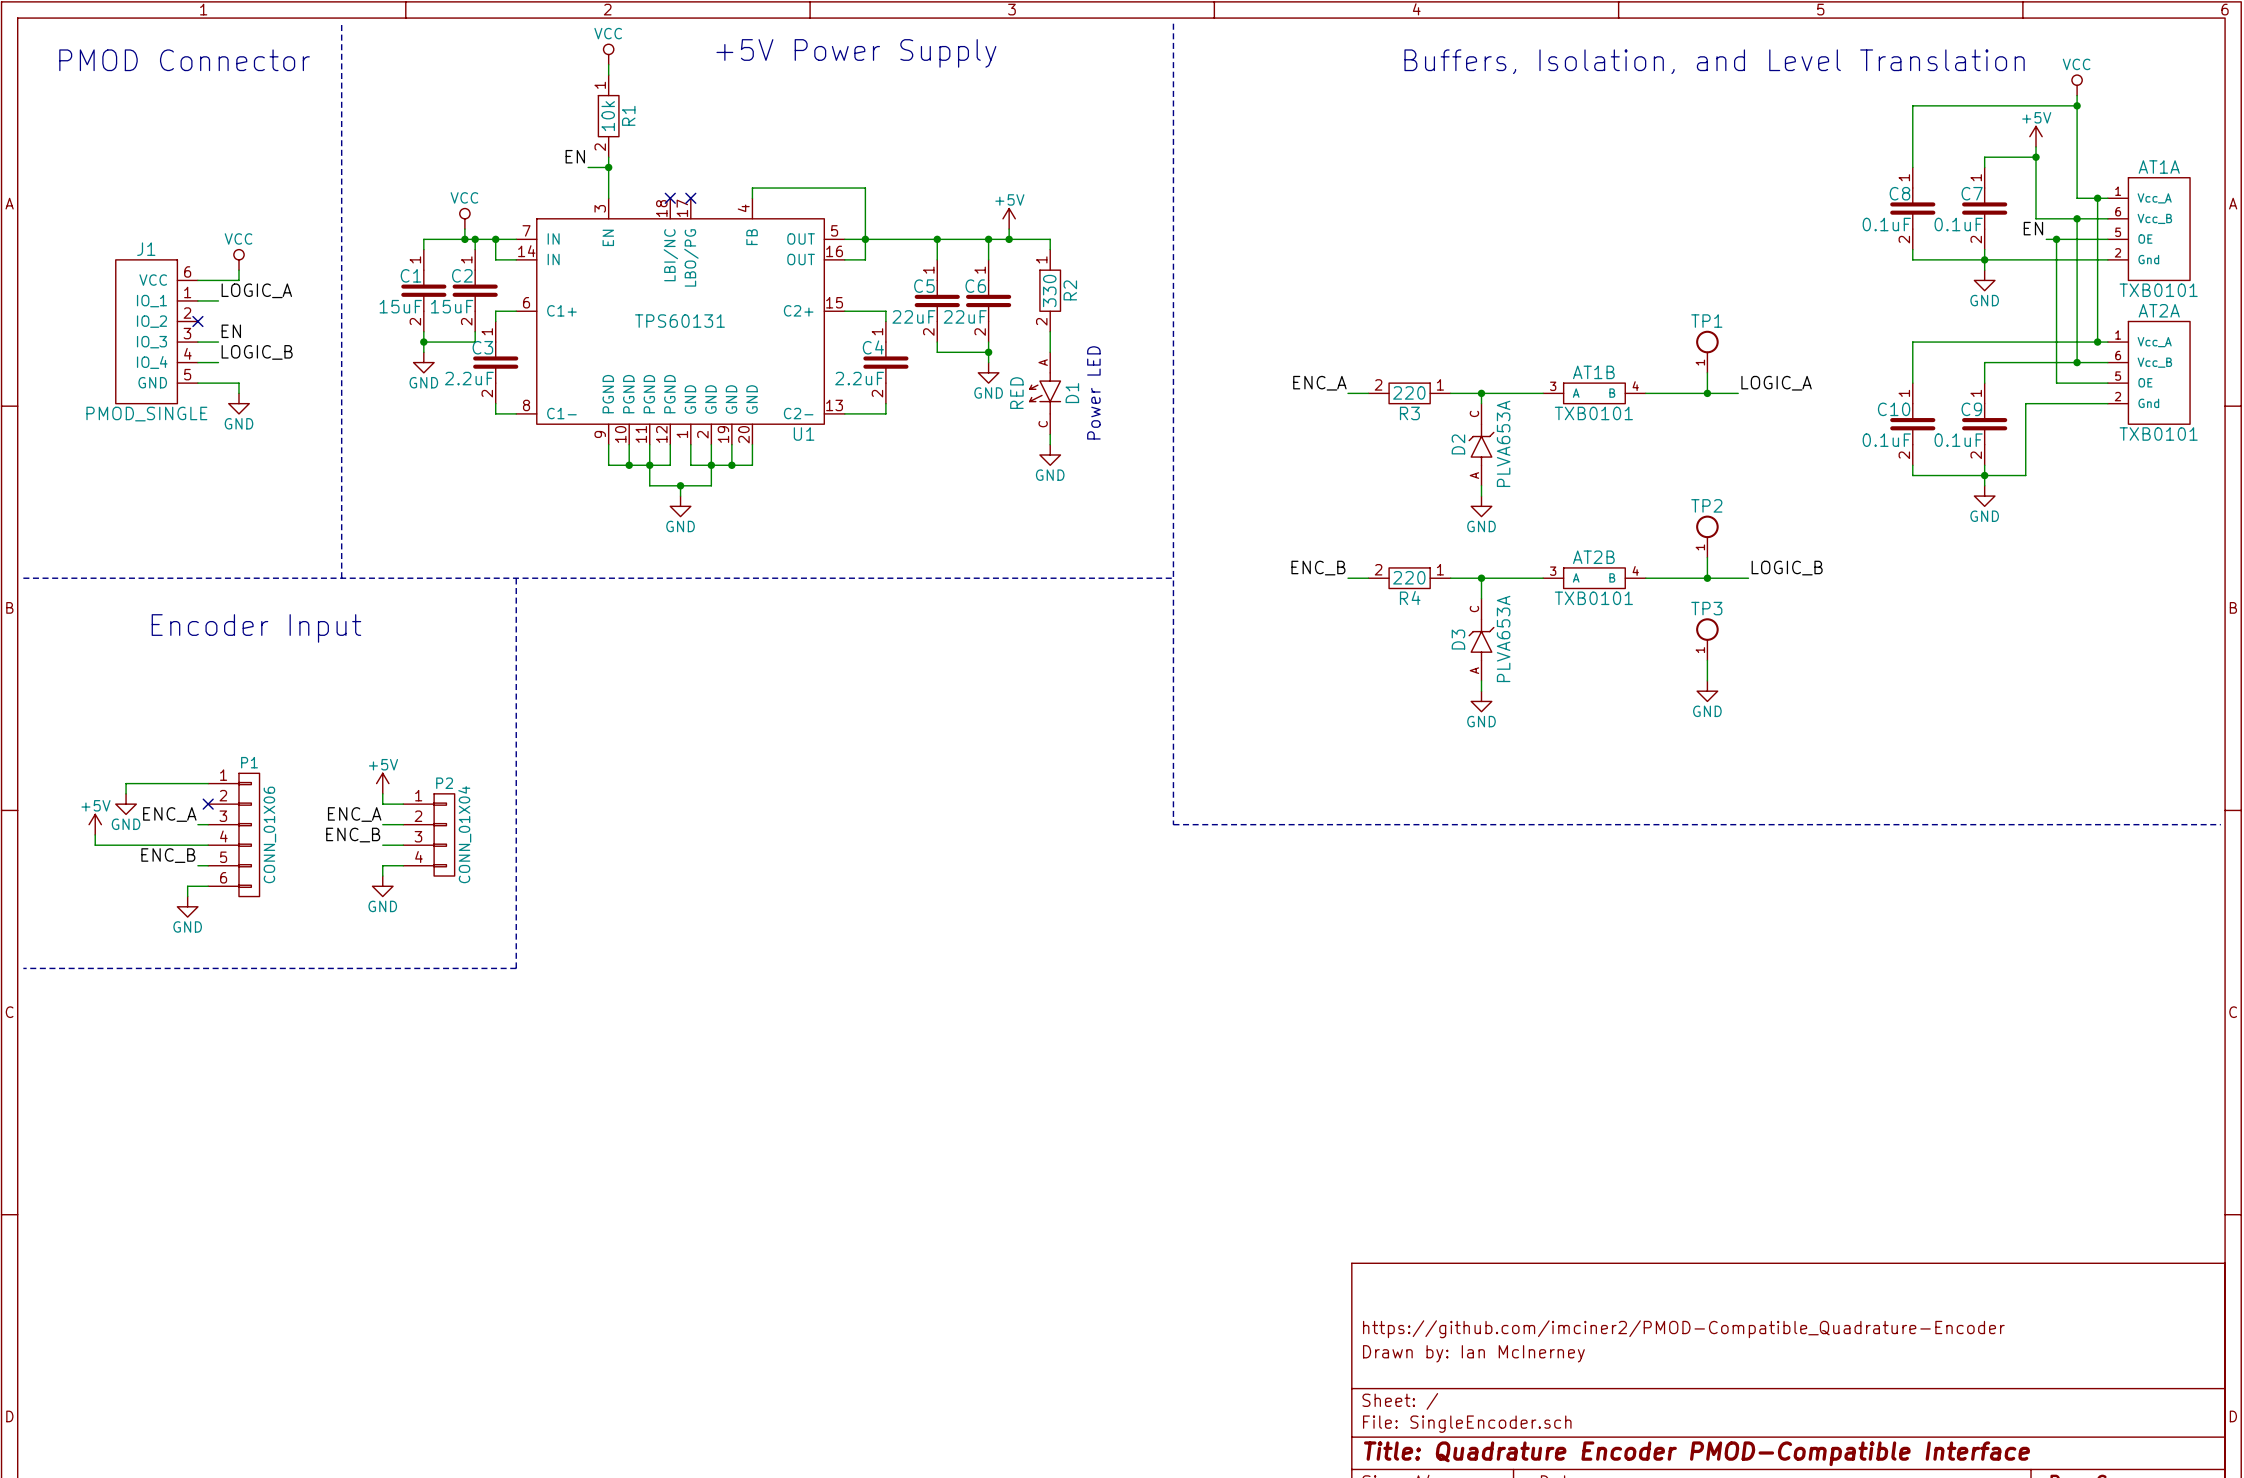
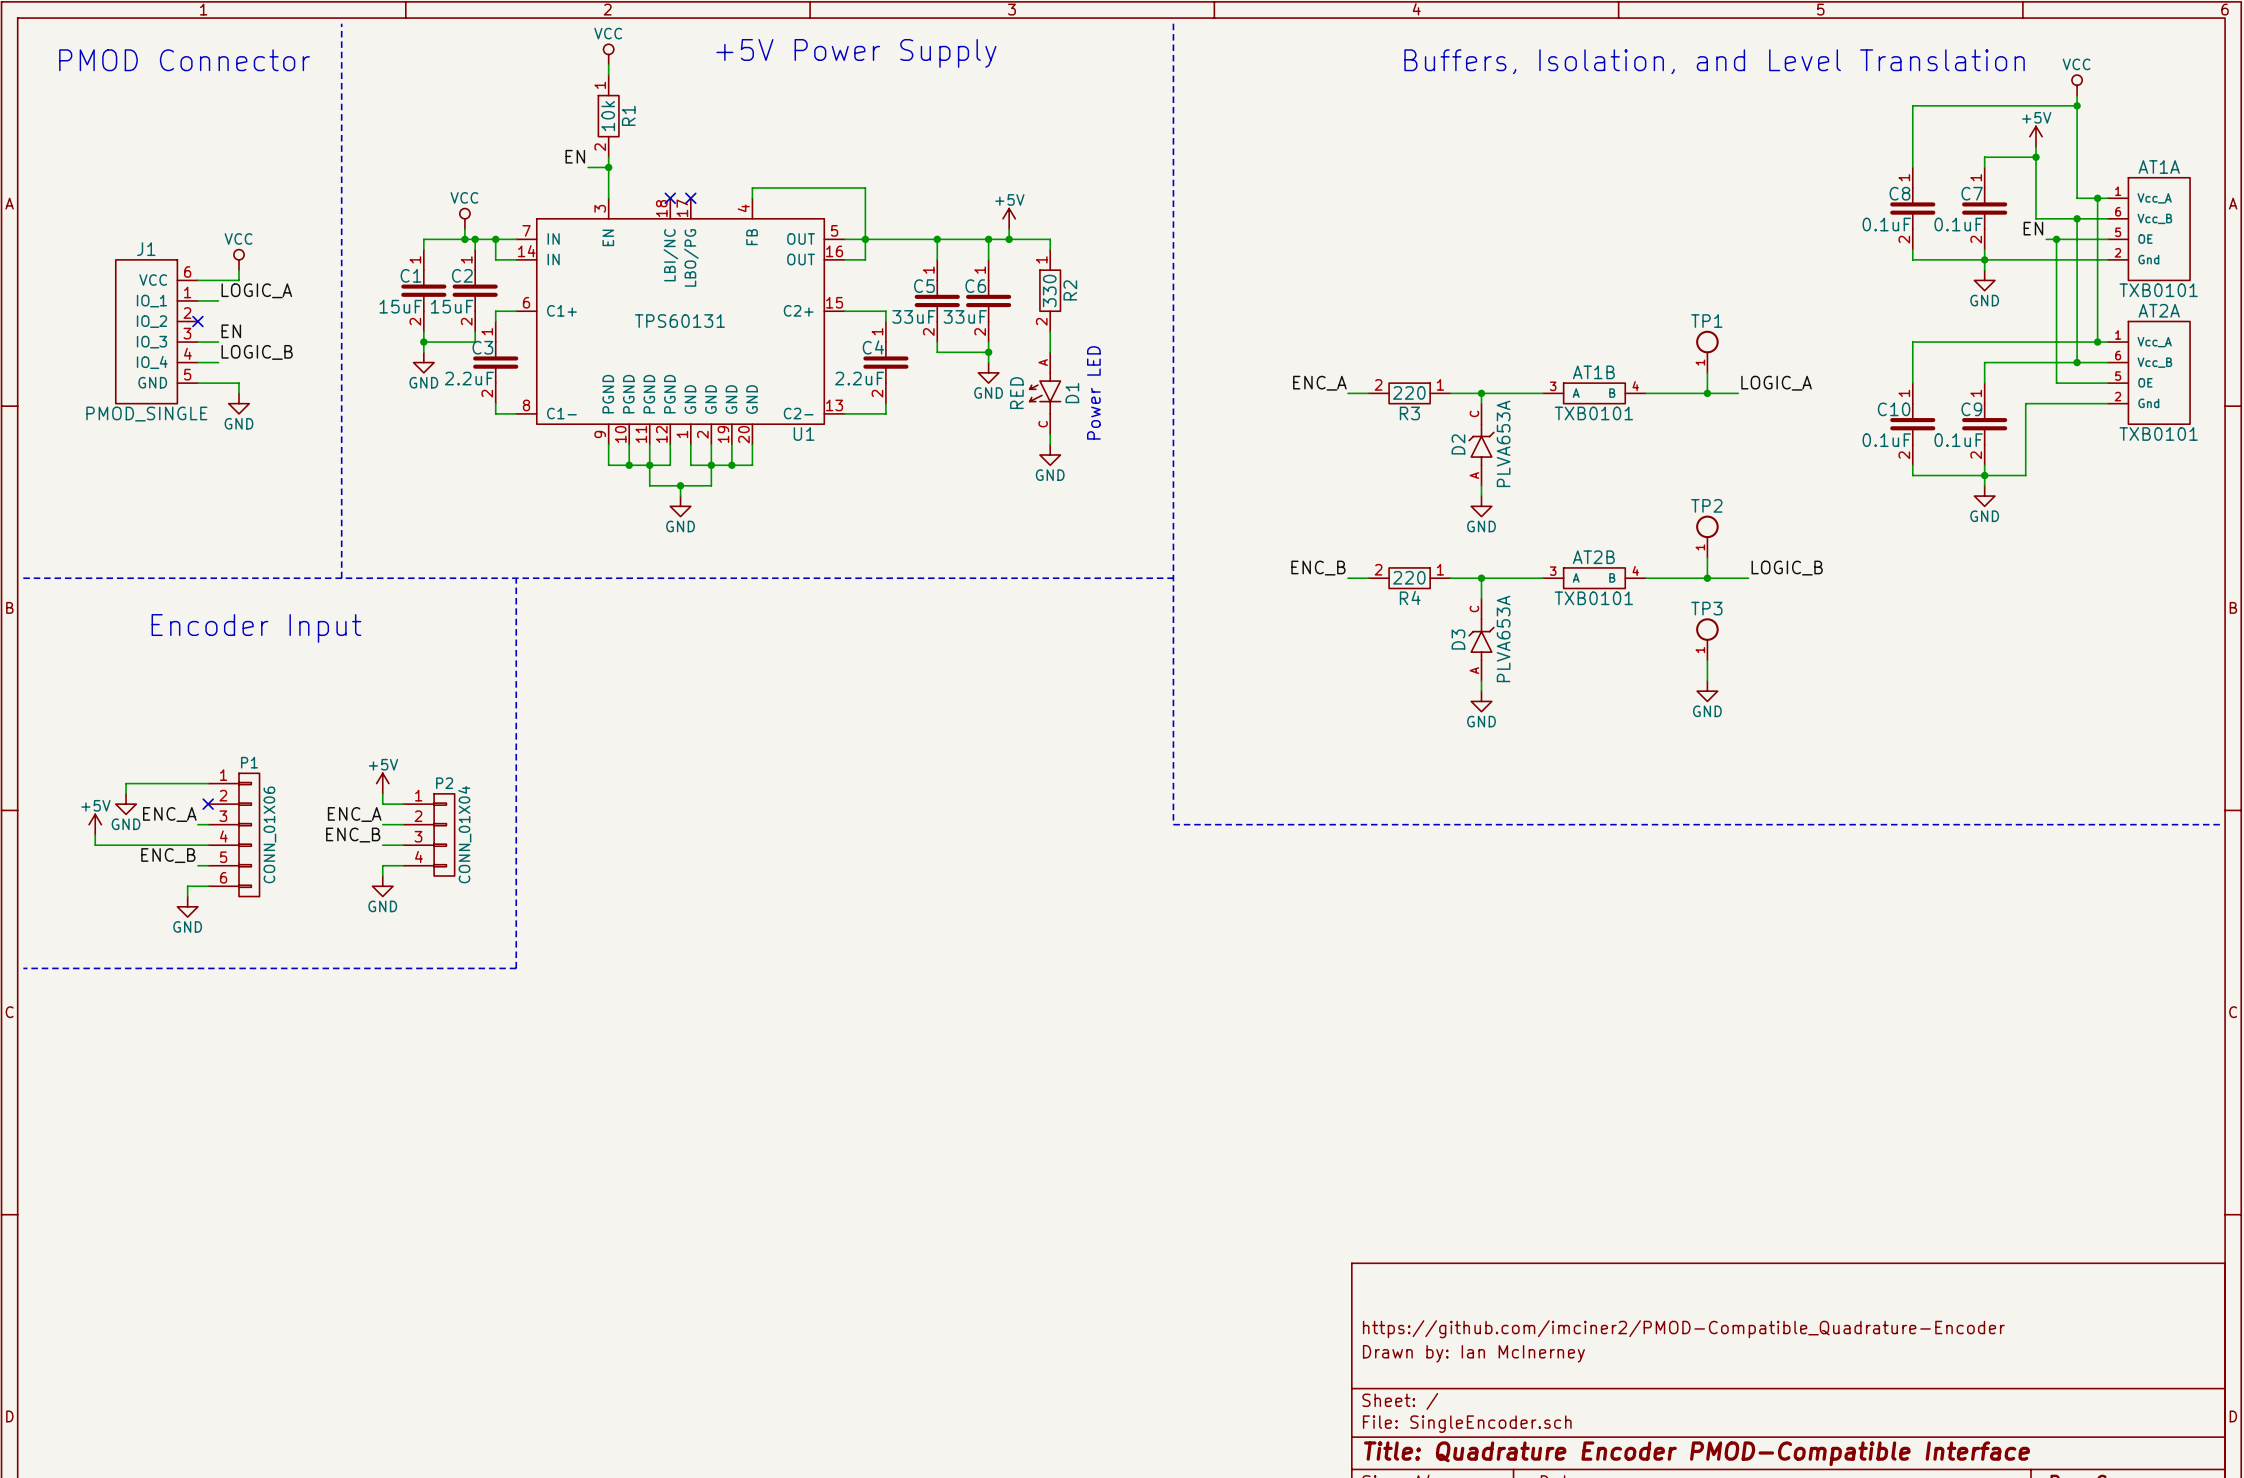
C5 value: 22uF (913, 316) -> 33uF (913, 316)
C6 value: 22uF (965, 316) -> 33uF (965, 316)

